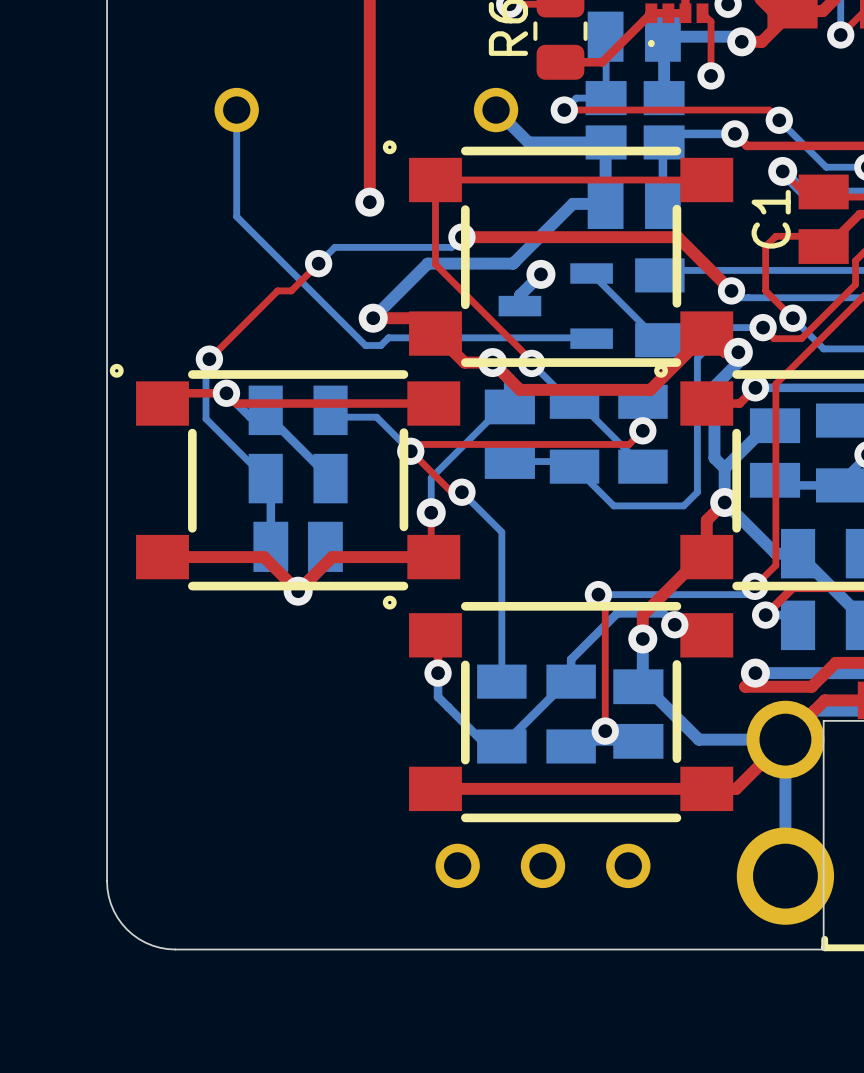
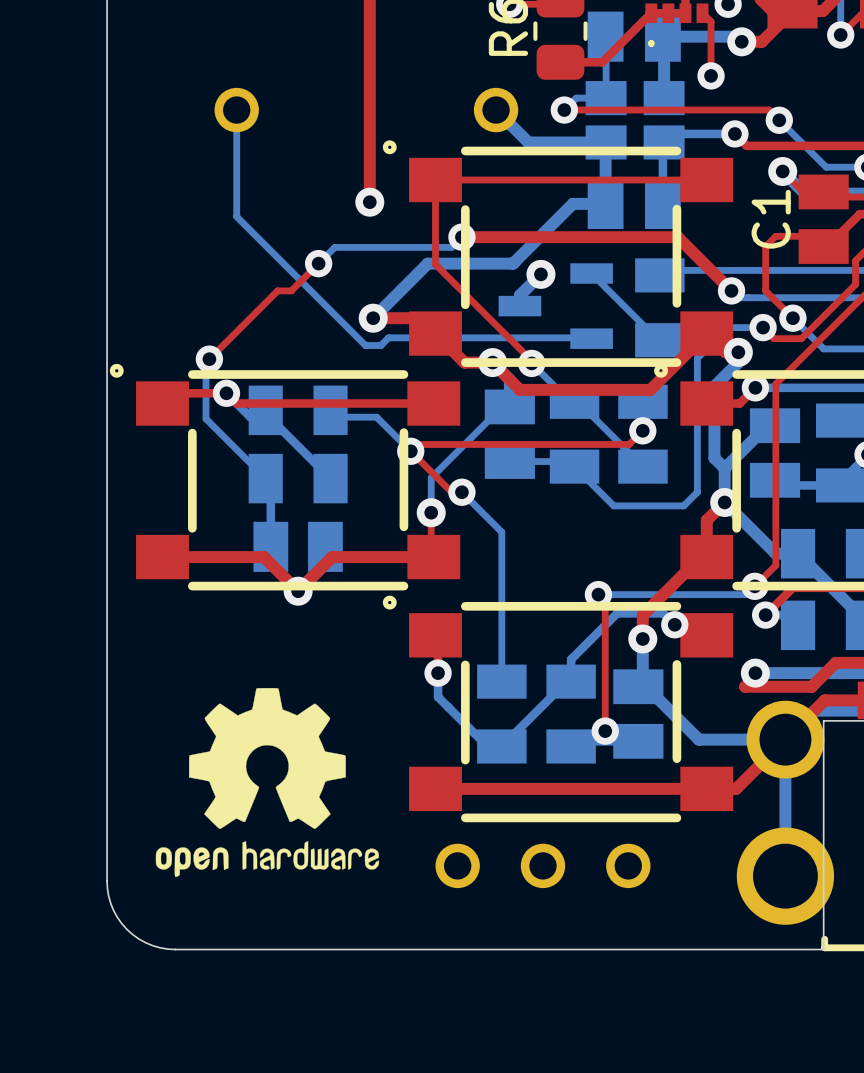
drawing: none -> [155, 688, 380, 878]

